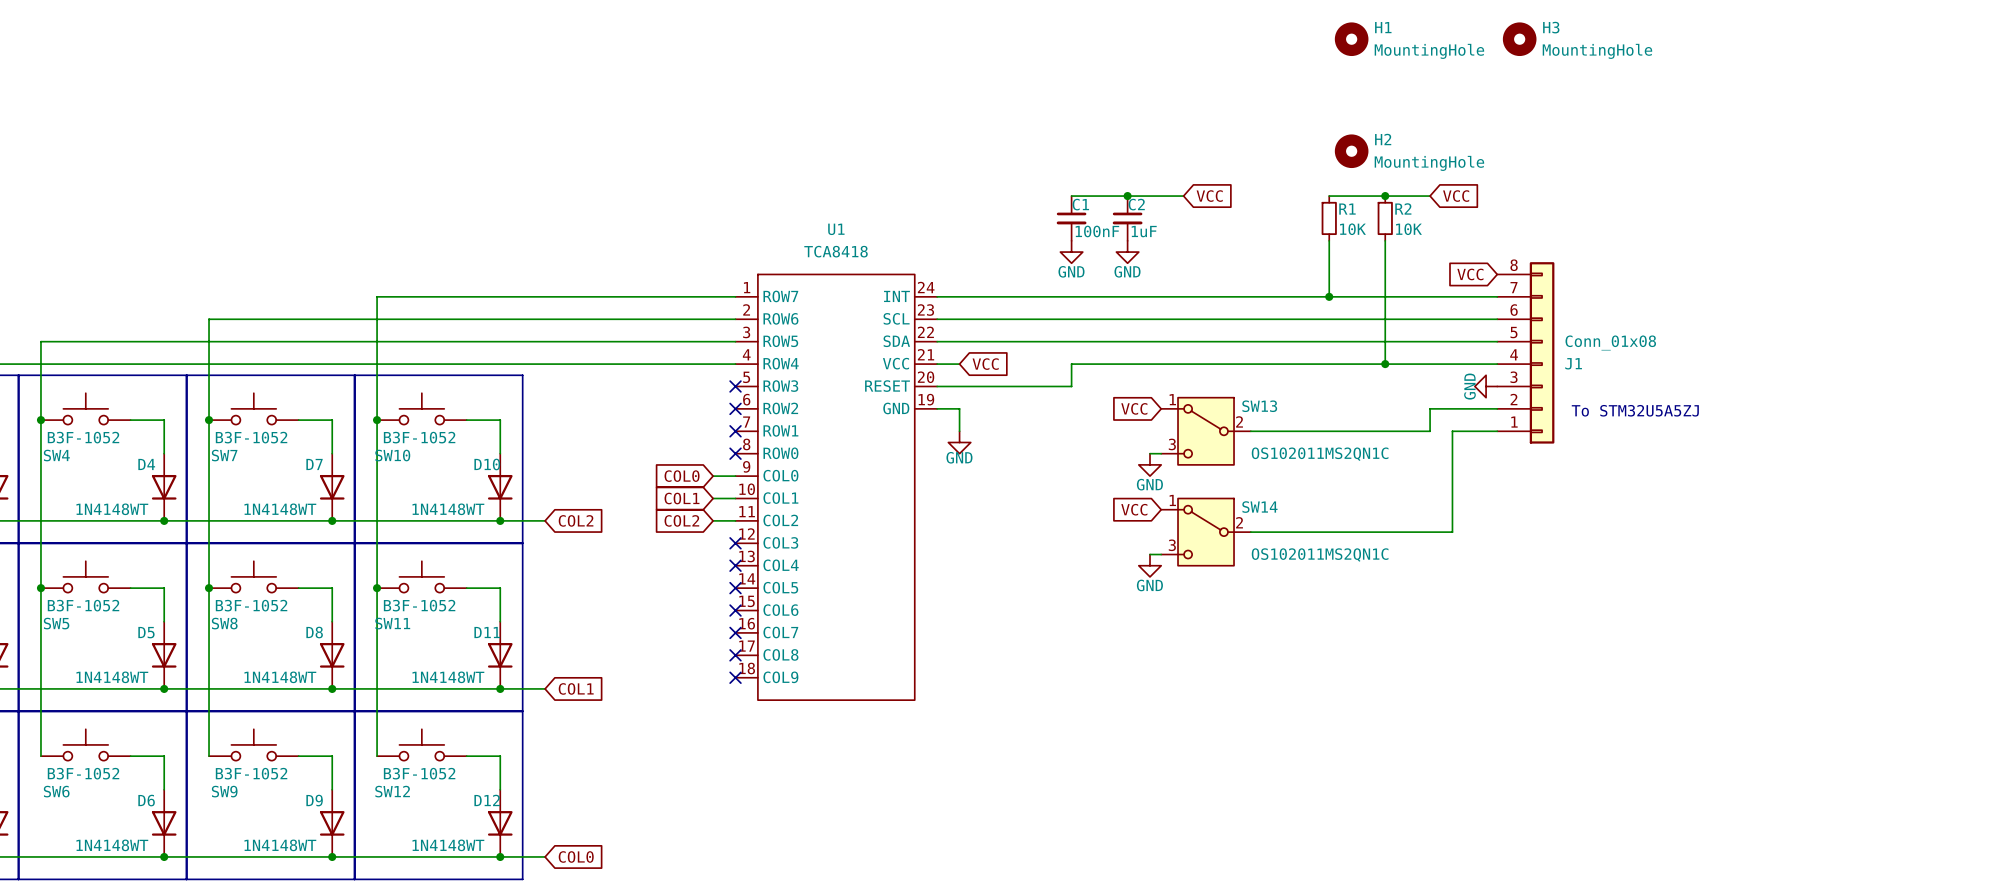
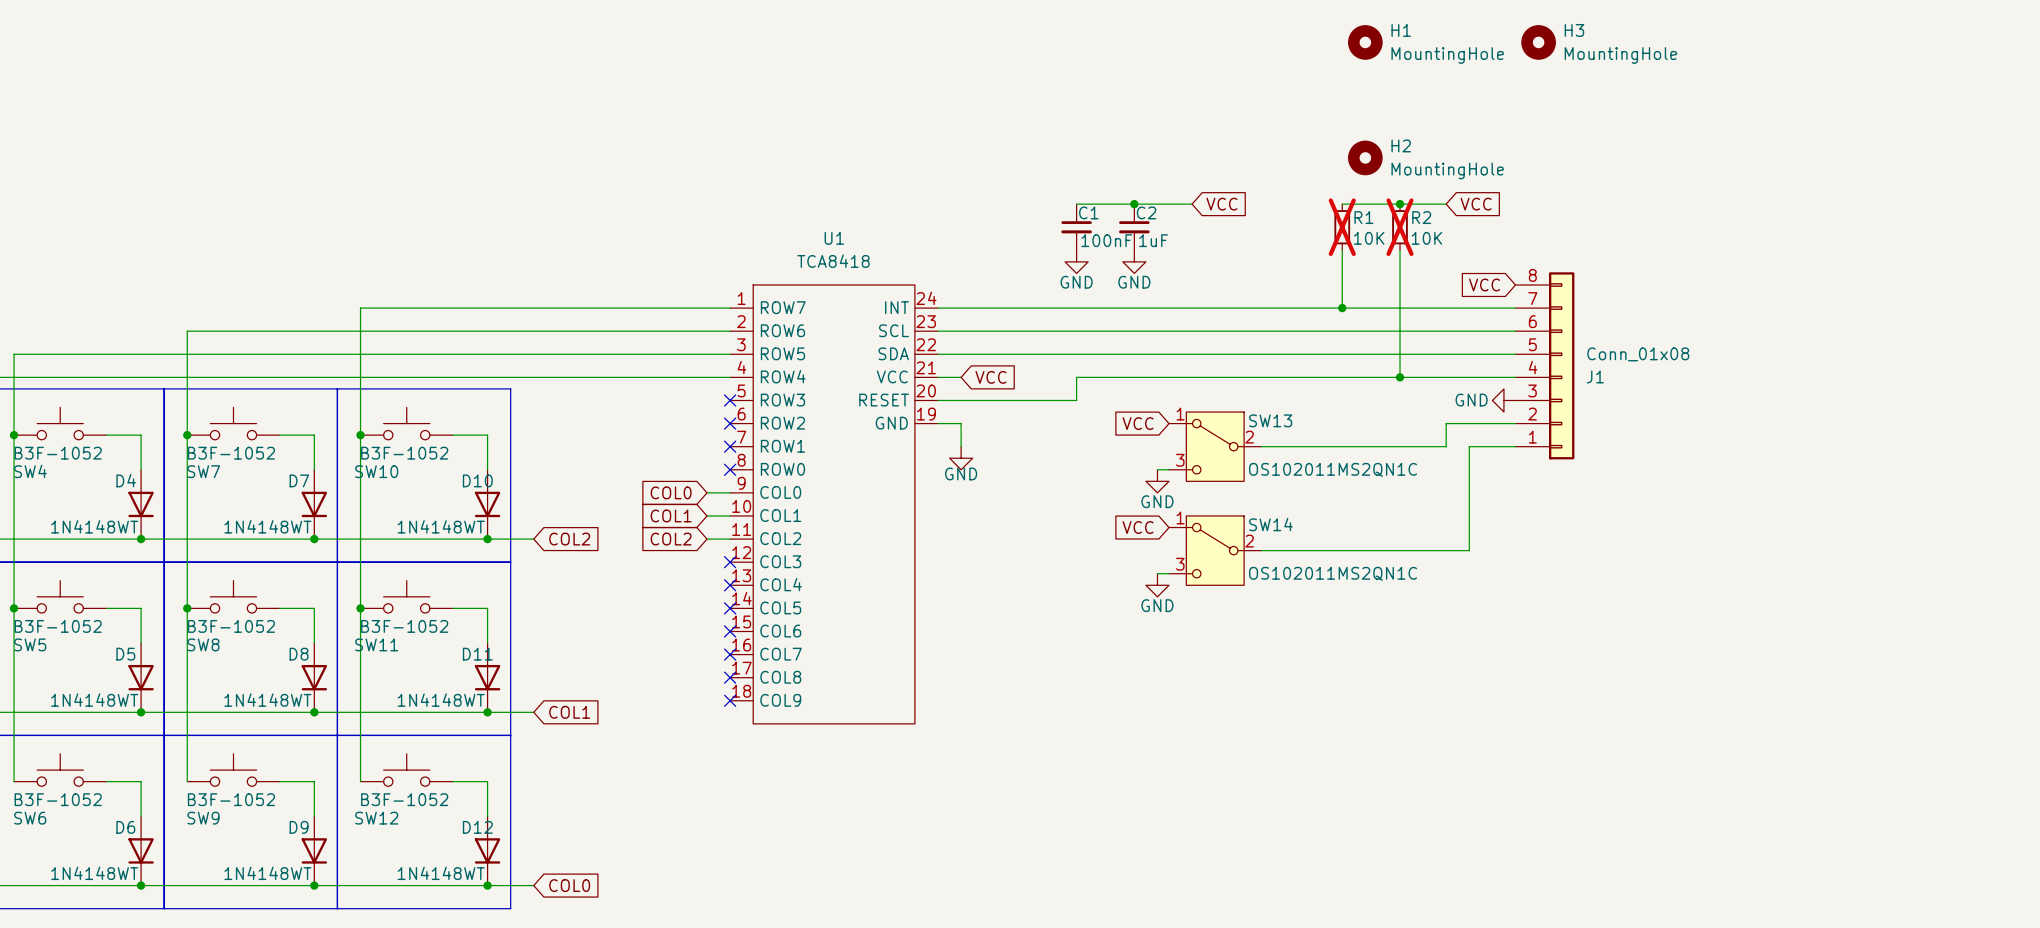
R1 do-not-place cross: none -> (1342, 227)
R2 do-not-place cross: none -> (1400, 227)
power symbol text rotation: 0° (1469, 386) -> 90° clockwise (1471, 400)
text: To STM32U5A5ZJ (1635, 410) -> none

